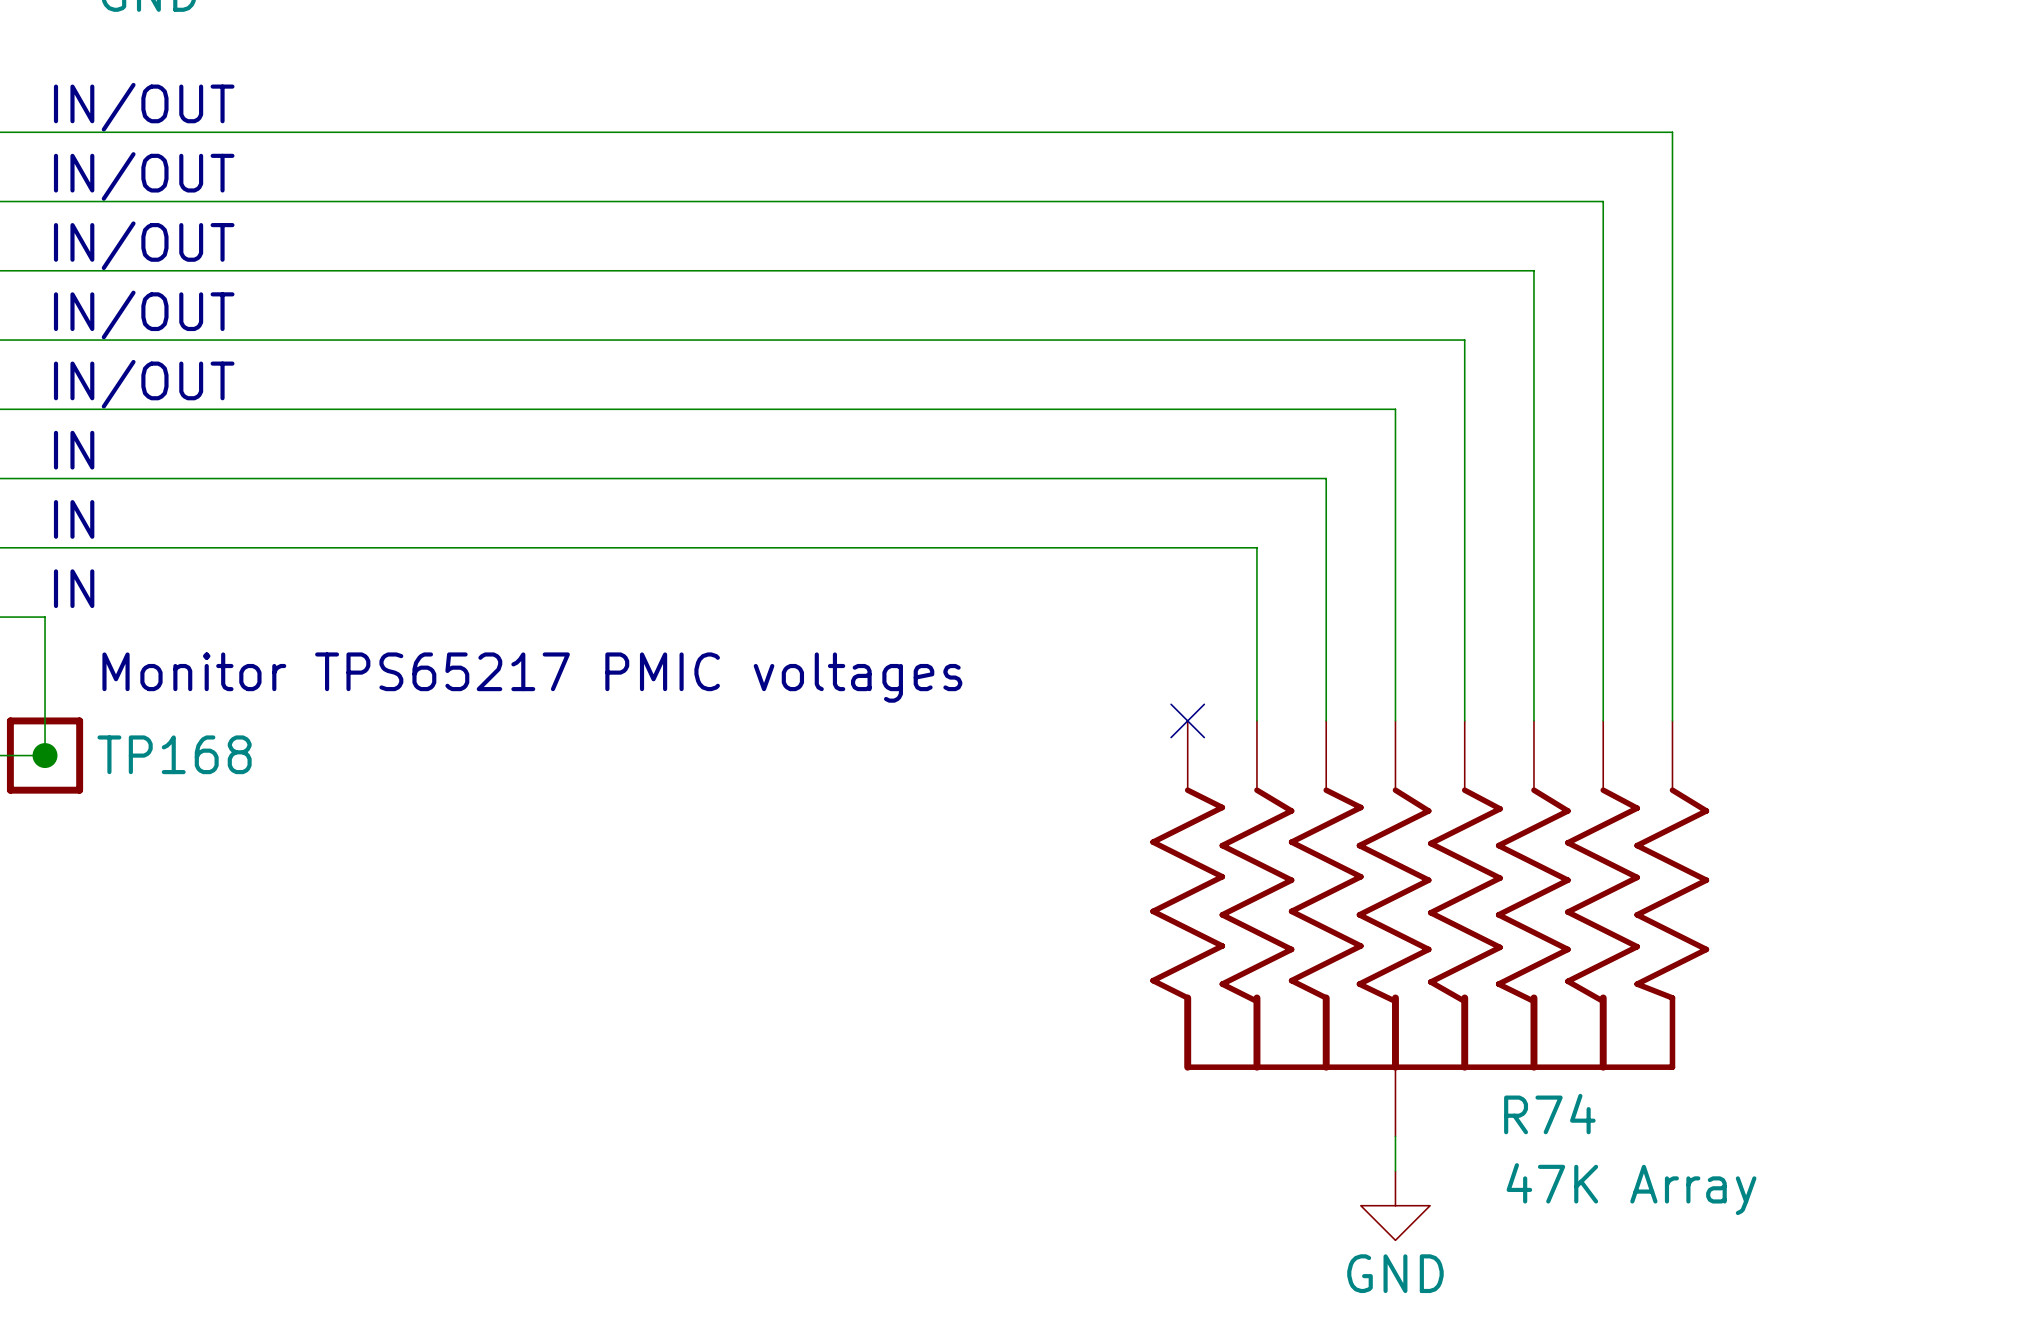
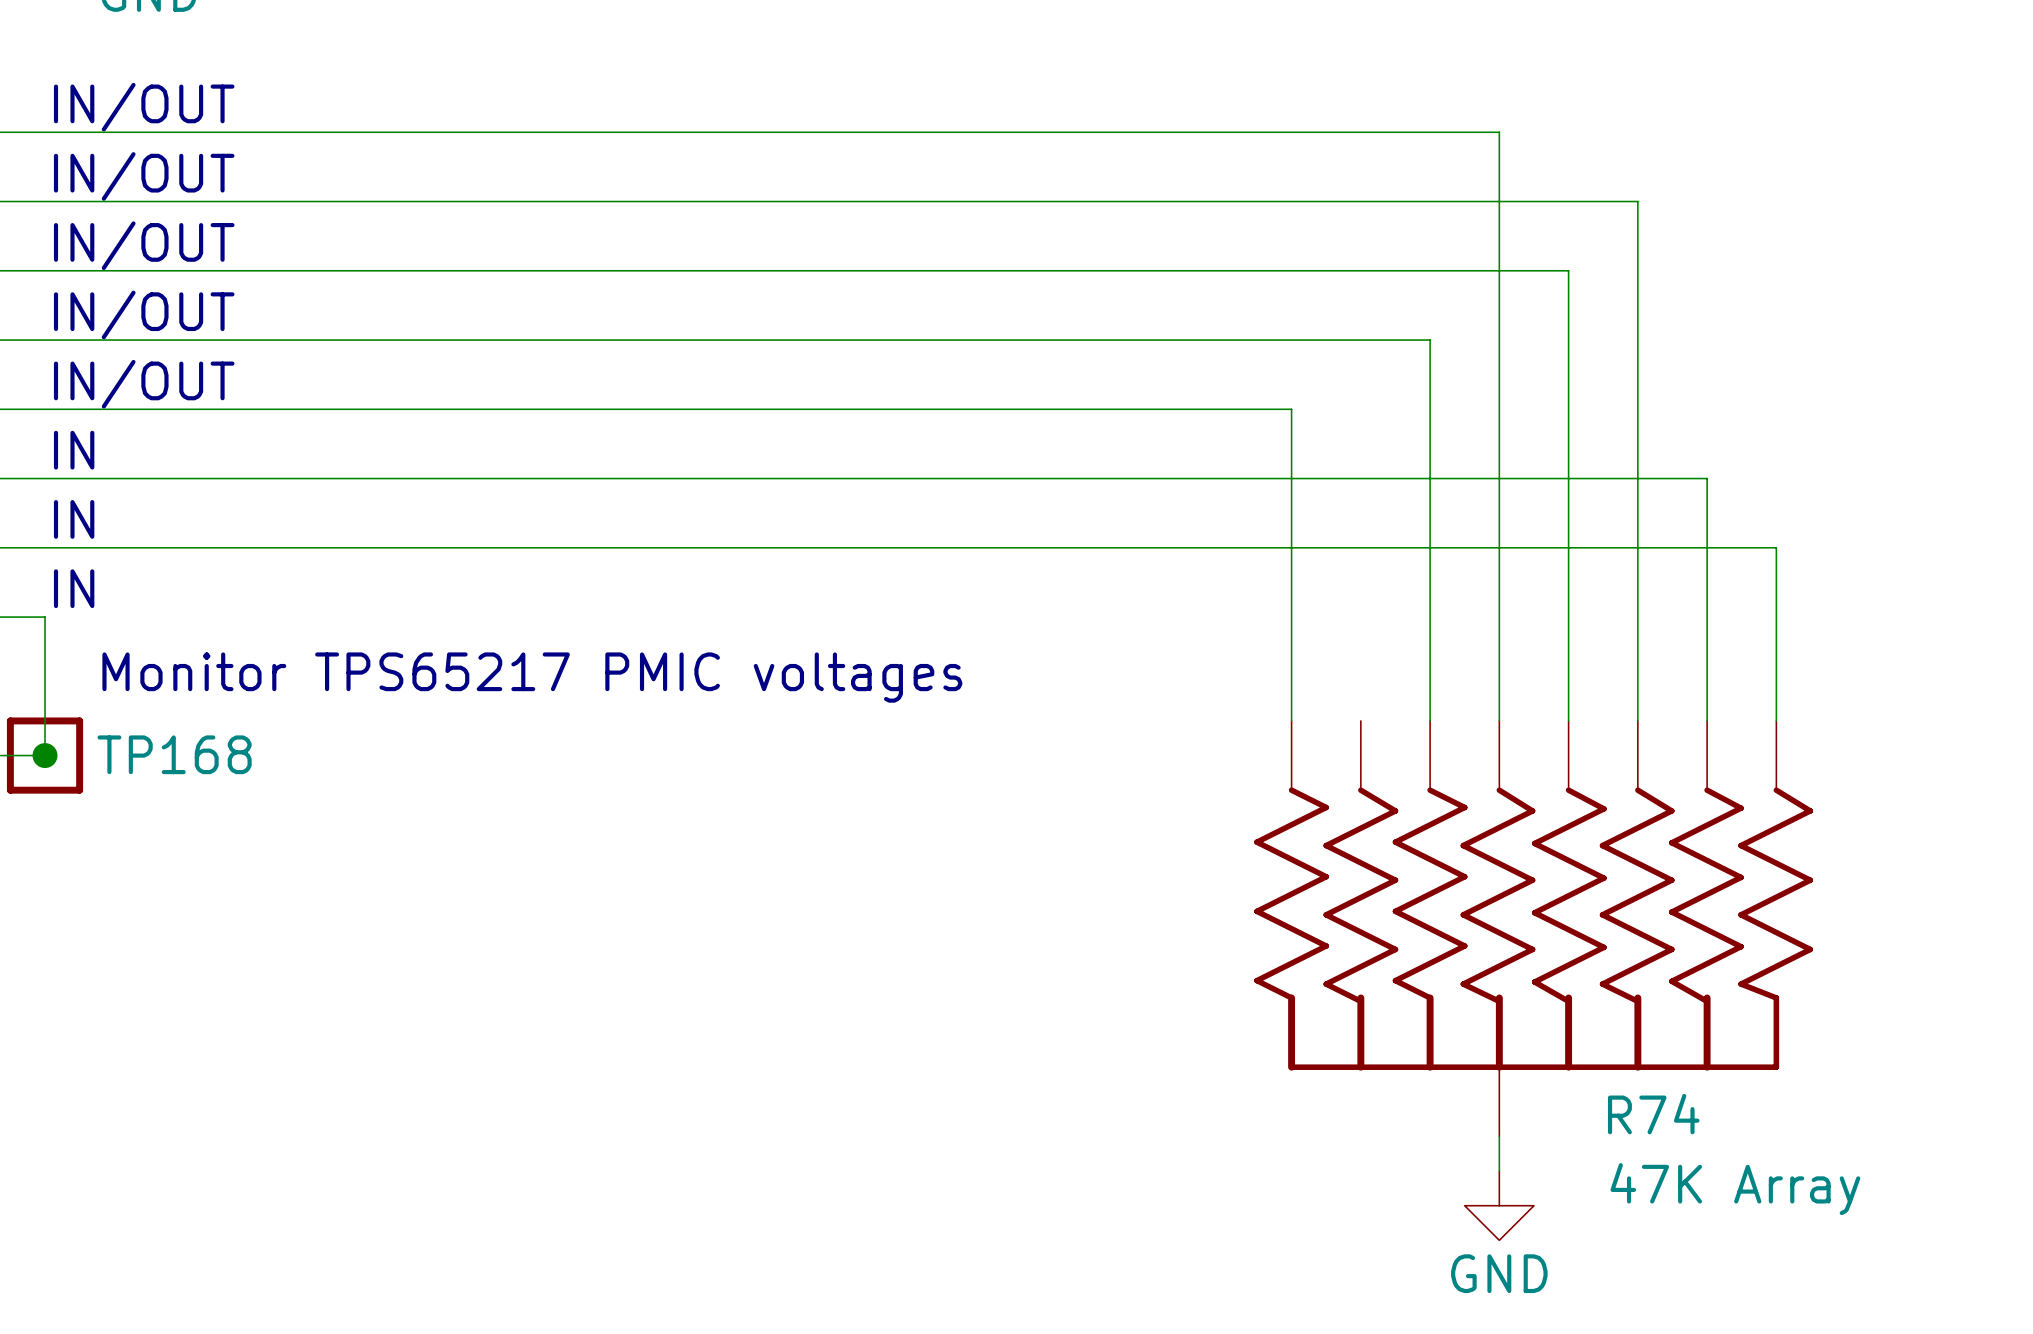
wire: (1499, 132) (1672, 132) (1672, 720) -> (1499, 132) (1499, 720)
wire: (1603, 201) (1603, 720) -> (1603, 201) (1637, 201) (1637, 720)
wire: (1533, 270) (1533, 720) -> (1533, 270) (1568, 270) (1568, 720)
wire: (1430, 340) (1464, 340) (1464, 720) -> (1430, 340) (1430, 720)
wire: (1291, 409) (1395, 409) (1395, 720) -> (1291, 409) (1291, 720)
wire: (1326, 478) (1326, 720) -> (1326, 478) (1707, 478) (1707, 720)
wire: (1256, 547) (1256, 720) -> (1256, 547) (1776, 547) (1776, 720)
no-connect mark: (1187, 720) -> none
R74 position: (1429, 928) -> (1533, 928)
wire: (1395, 1136) (1395, 1171) -> (1499, 1136) (1499, 1171)
power symbol position: GND (1395, 1205) -> GND (1499, 1205)

